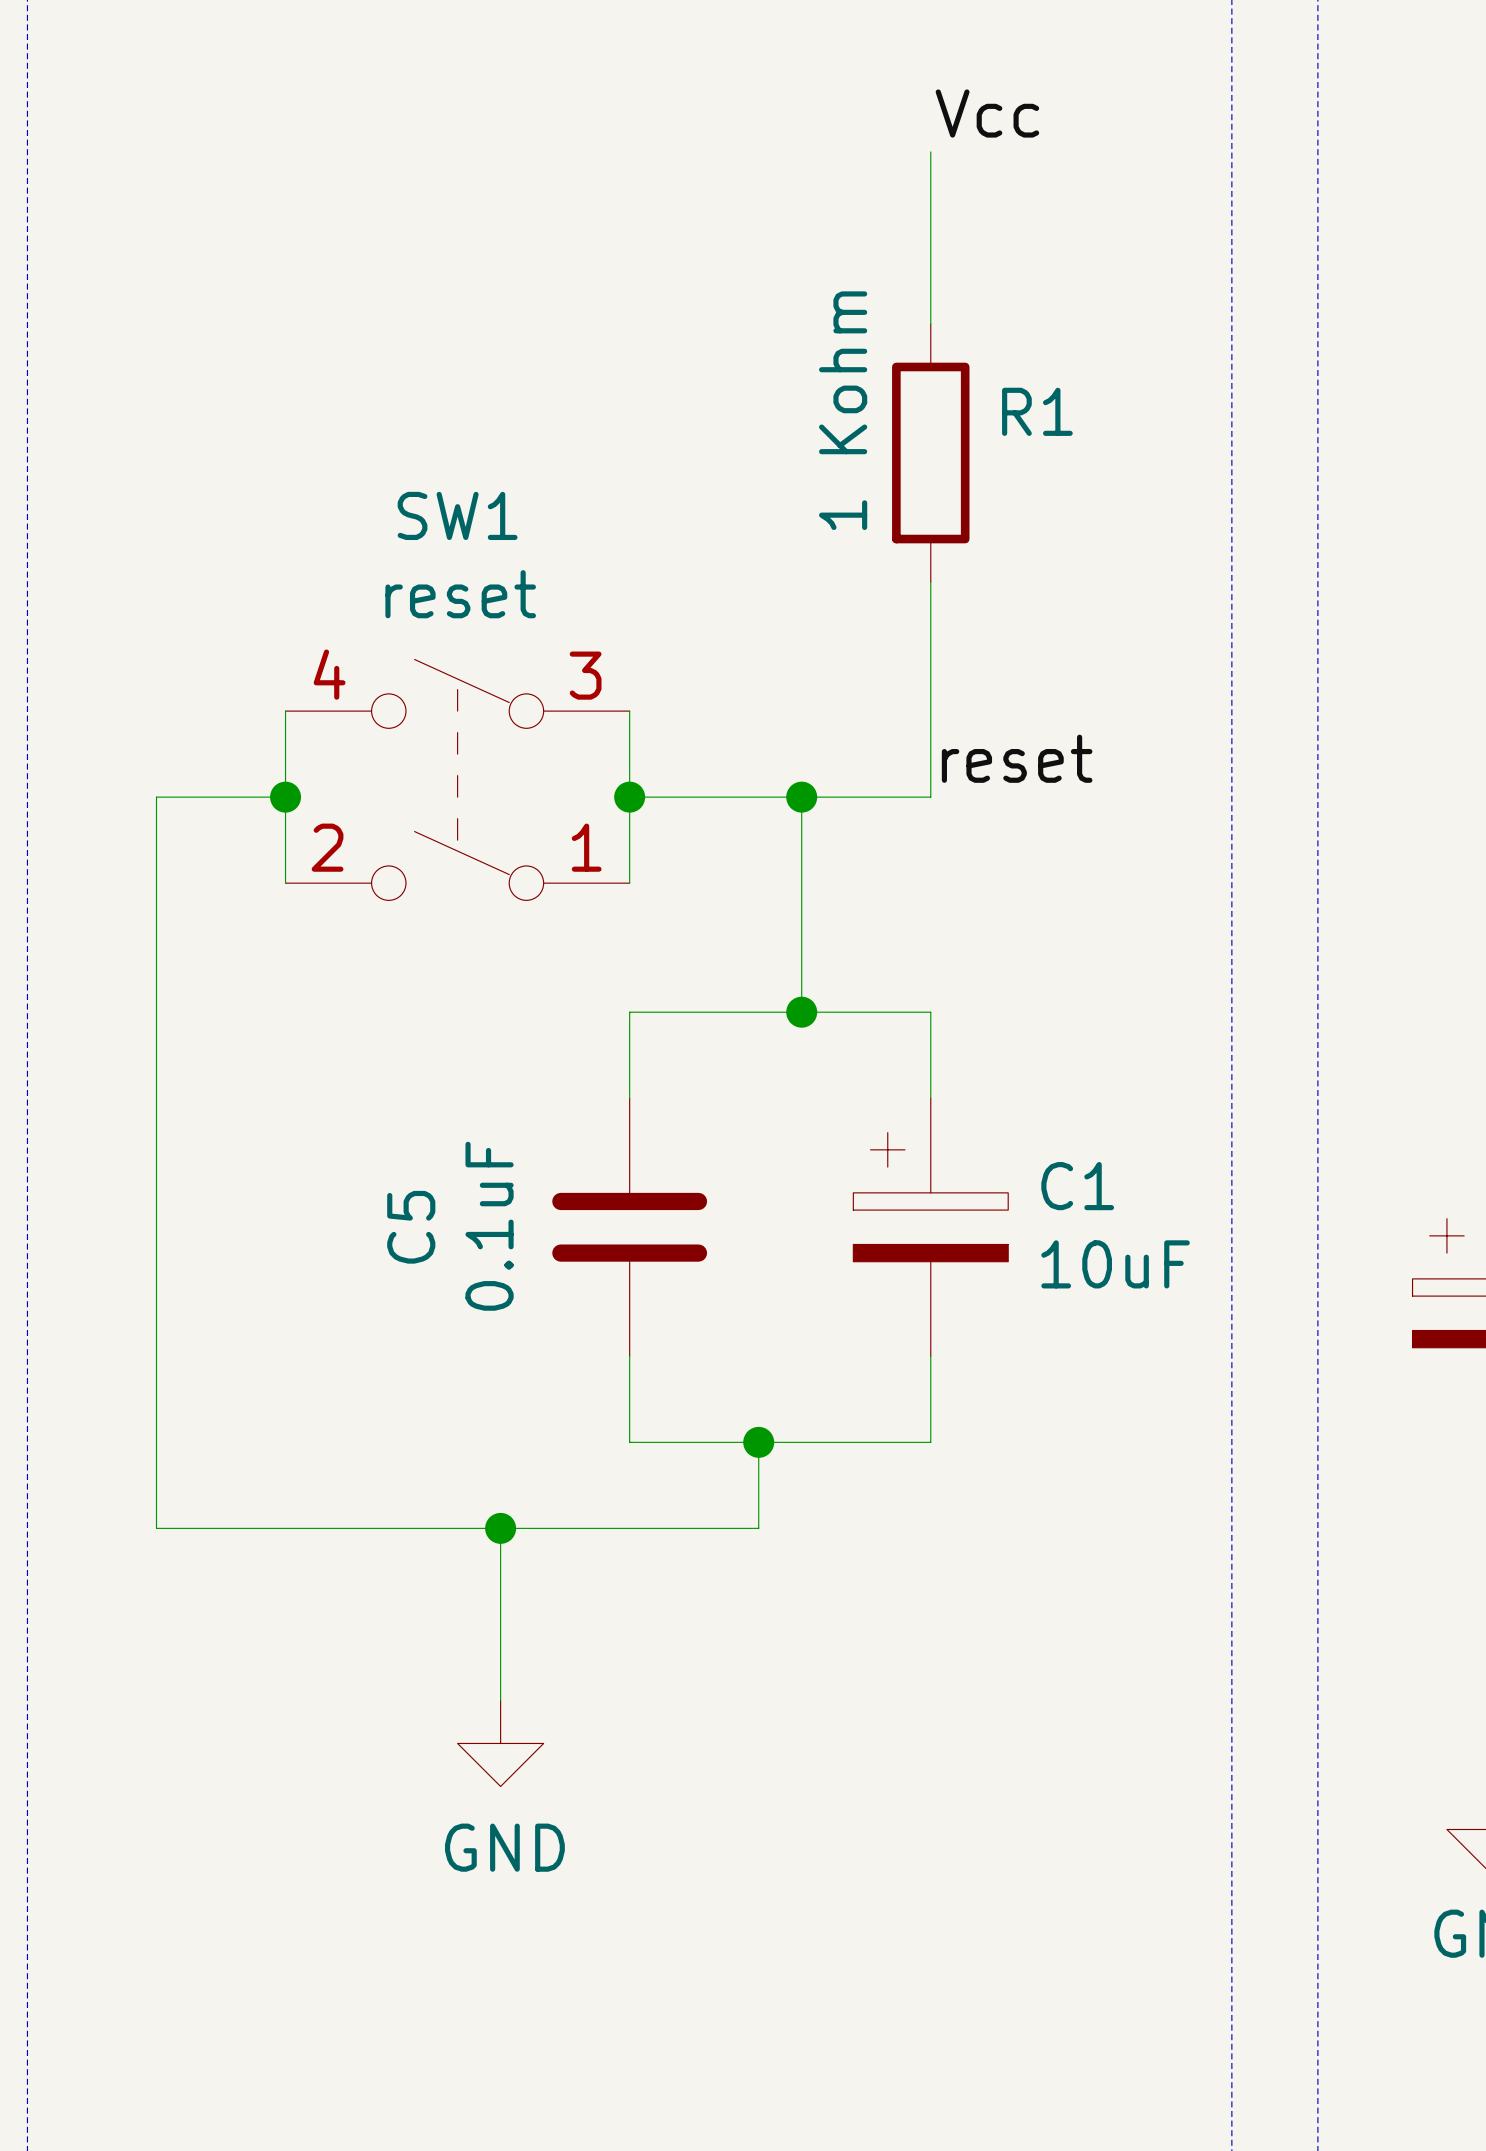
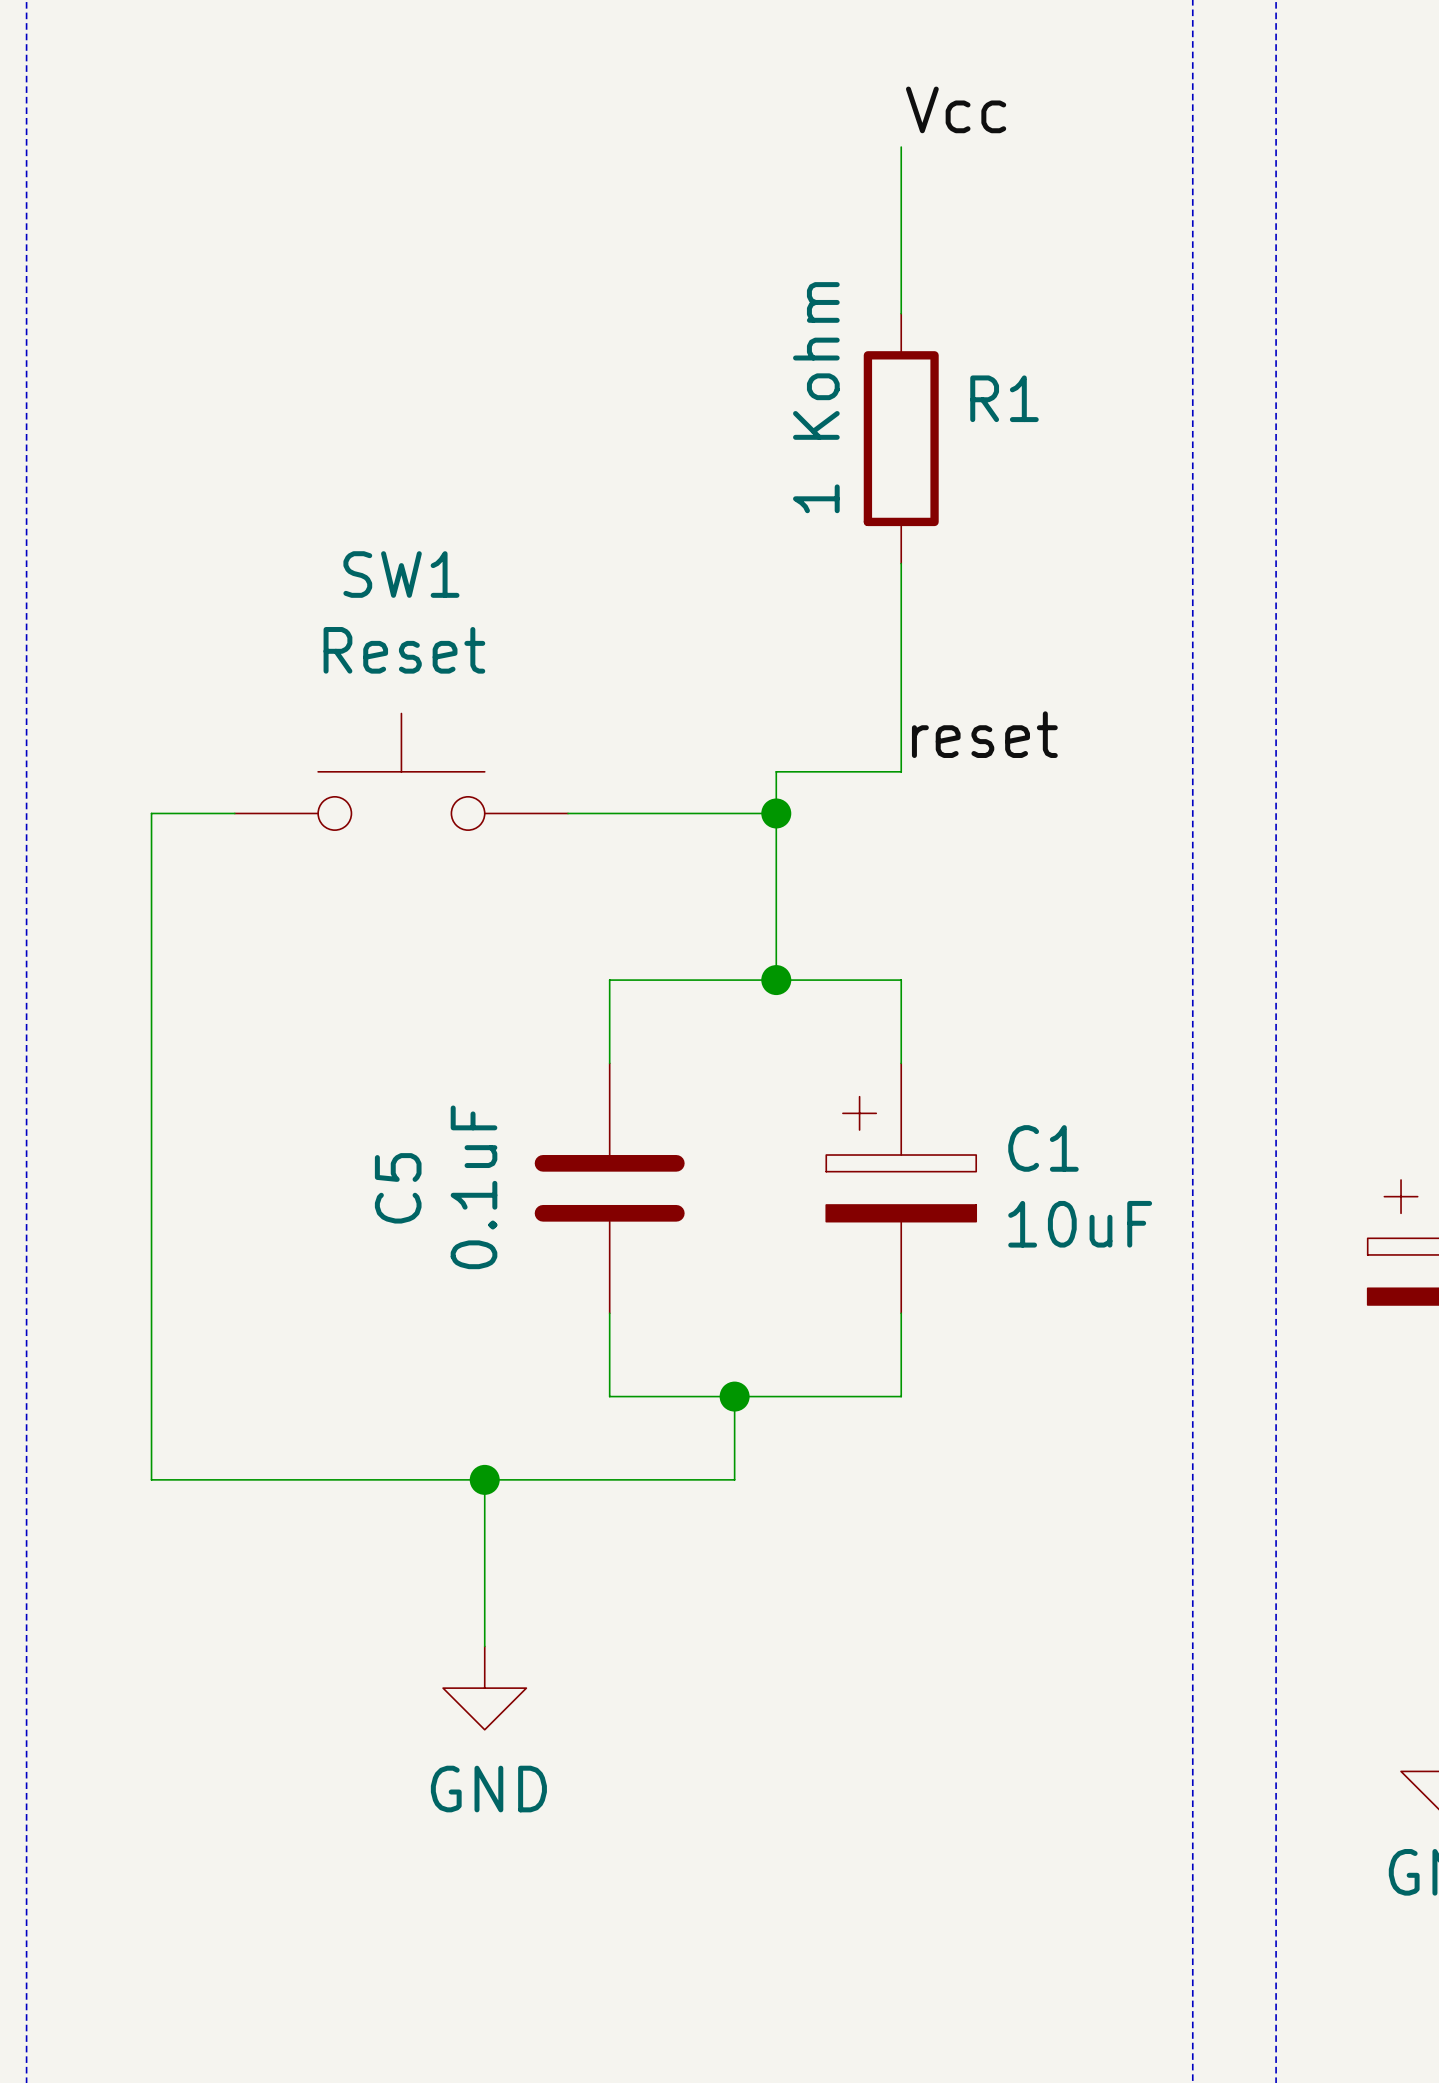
SW1 value: reset (460, 594) -> Reset (404, 650)
SW1 symbol: [285, 659, 630, 901] -> [234, 713, 569, 831]
wire: (285, 711) (285, 883) -> none
wire: (629, 711) (629, 883) -> none
wire: (285, 797) (156, 797) (156, 840) -> (234, 813) (151, 813)
junction: (285, 797) -> none
wire: (629, 797) (801, 797) -> none
junction: (629, 797) -> none
junction position: (801, 797) -> (776, 813)
wire: none -> (568, 813) (776, 813)

